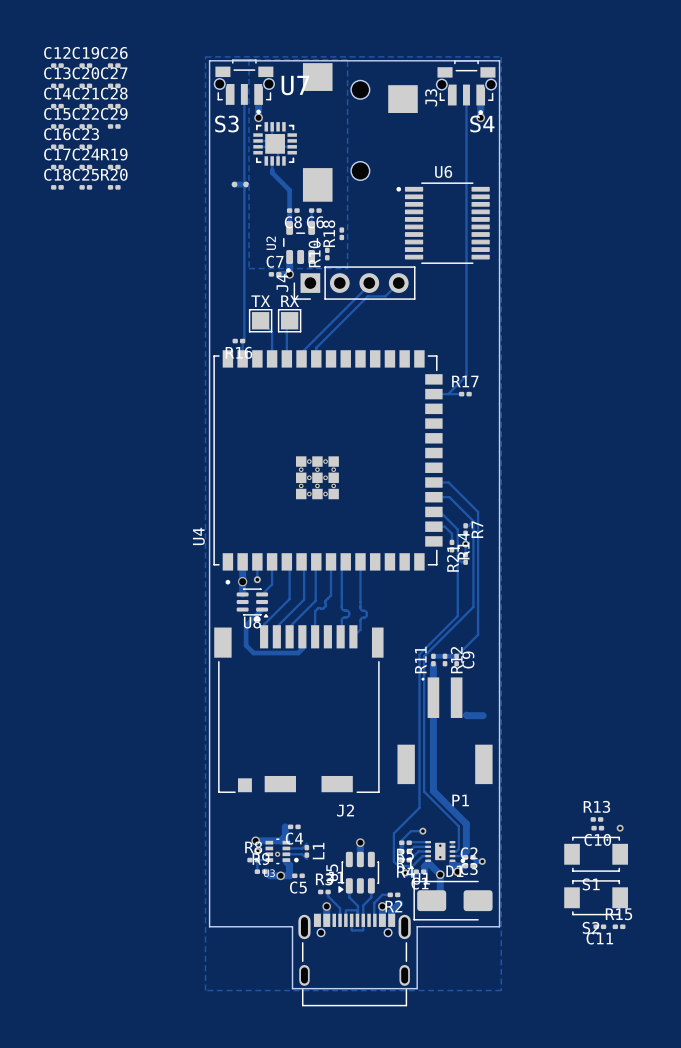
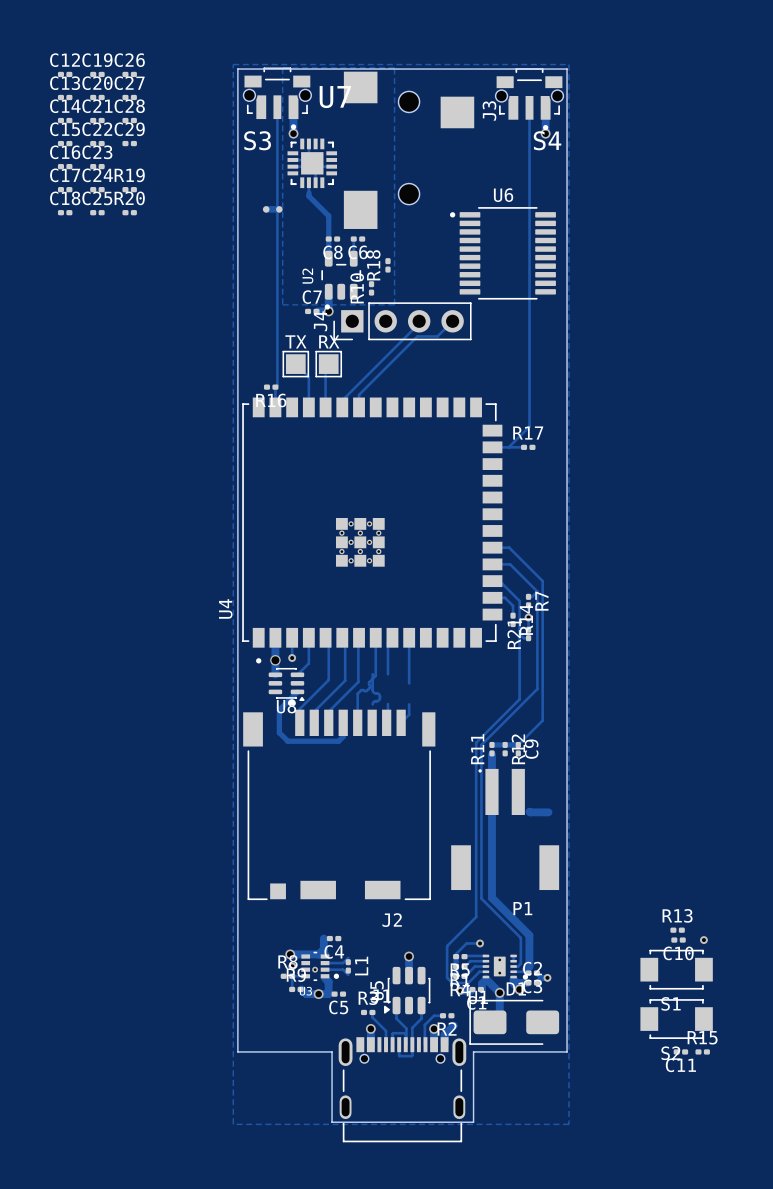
track: none -> (372, 674) (372, 691) (379, 696) (379, 700) (372, 704)
track: (341, 594) (341, 608) (349, 613) (348, 616) (341, 620) -> none
track: (360, 602) (360, 609) (366, 613) (366, 616) (360, 620) -> none

